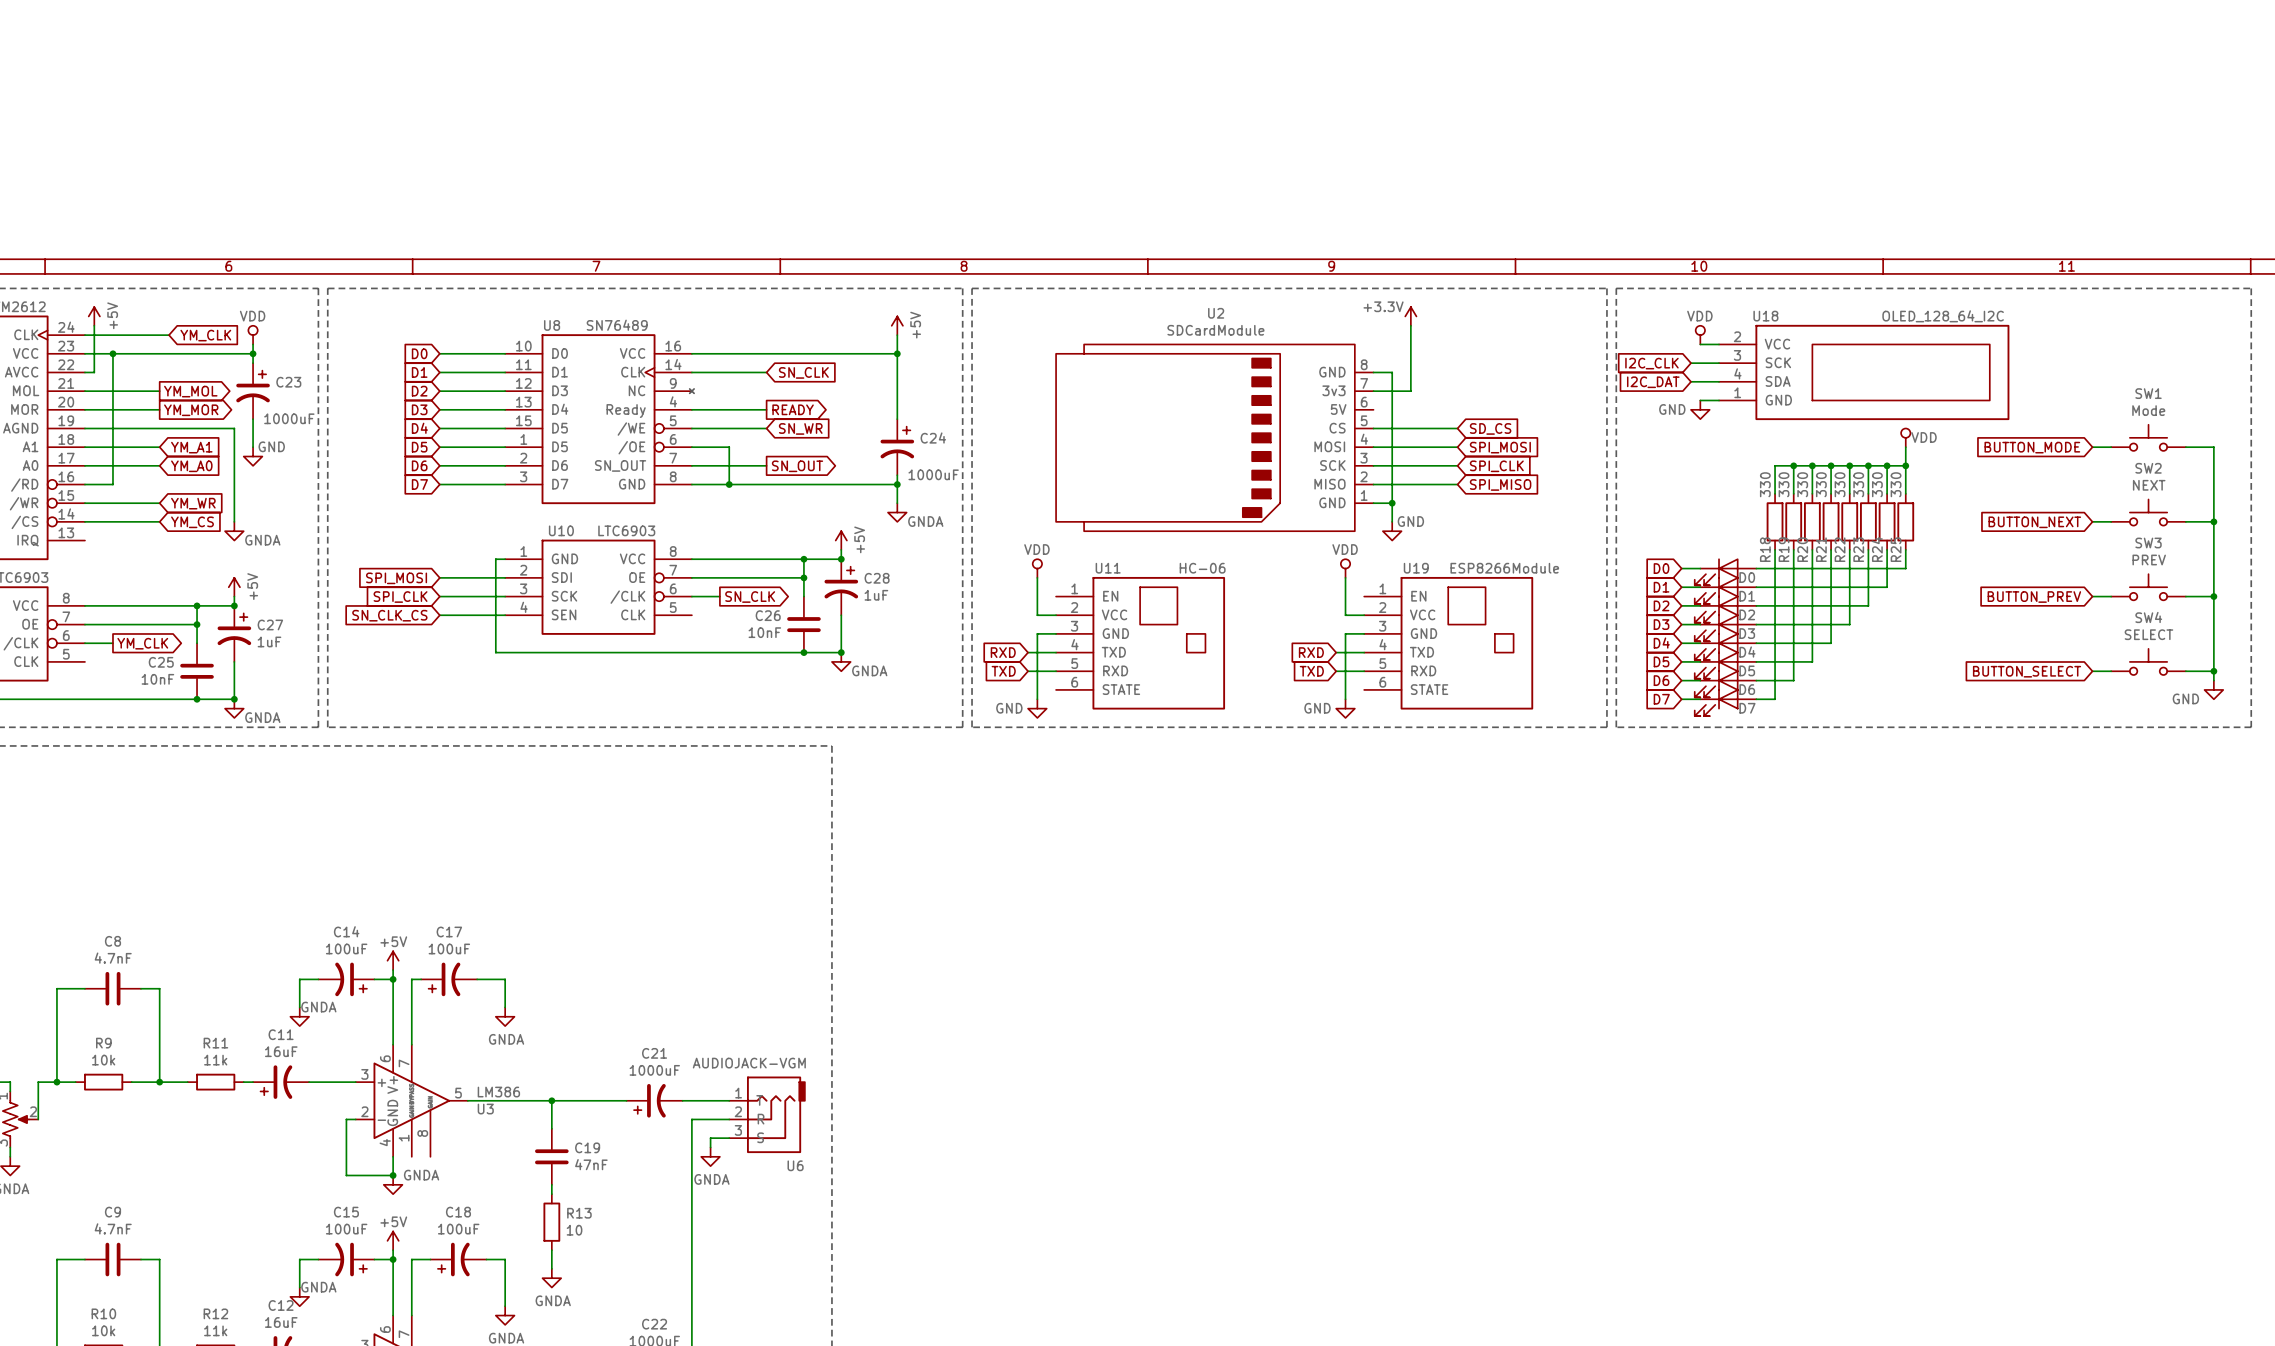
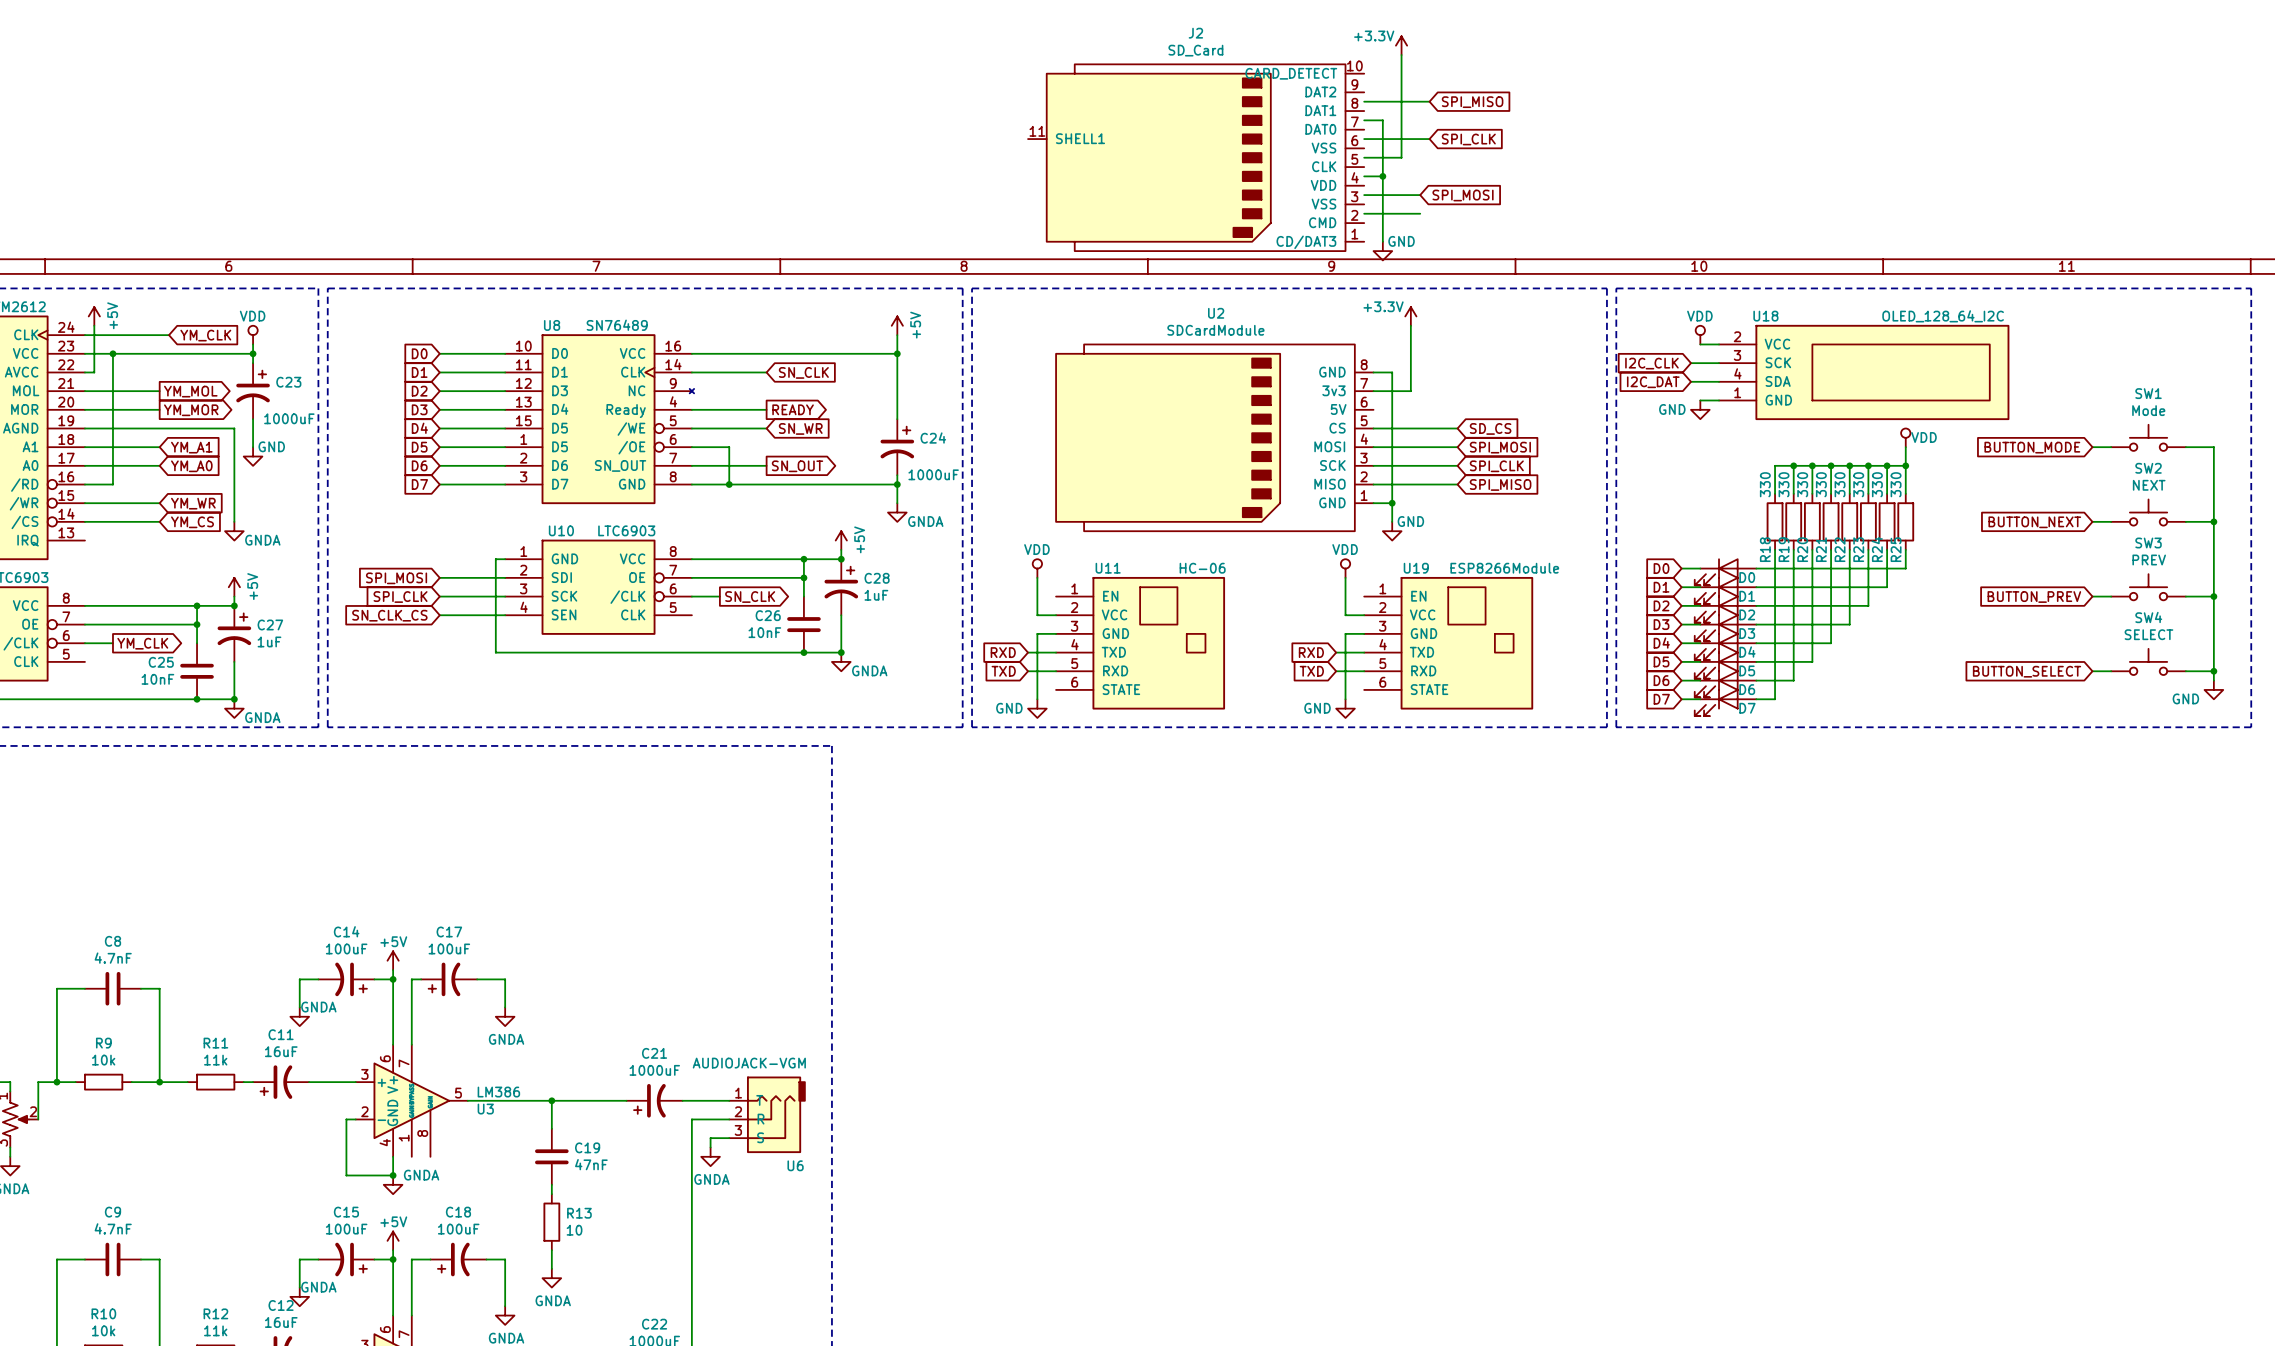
power symbol: none -> +3.3V (1401, 45)
wire: none -> (1401, 55) (1401, 157) (1364, 157)
wire: none -> (1364, 101) (1429, 101)
global label: none -> SPI_MISO (1472, 102)
wire: none -> (1364, 120) (1382, 120) (1382, 241)
wire: none -> (1364, 139) (1429, 139)
global label: none -> SPI_CLK (1468, 139)
J2: none -> SD_Card (1196, 157)
wire: none -> (1364, 176) (1382, 176)
junction: none -> (1382, 176)
wire: none -> (1364, 195) (1420, 195)
global label: none -> SPI_MOSI (1463, 195)
wire: none -> (1364, 213) (1420, 213)
power symbol: none -> GND (1382, 251)

